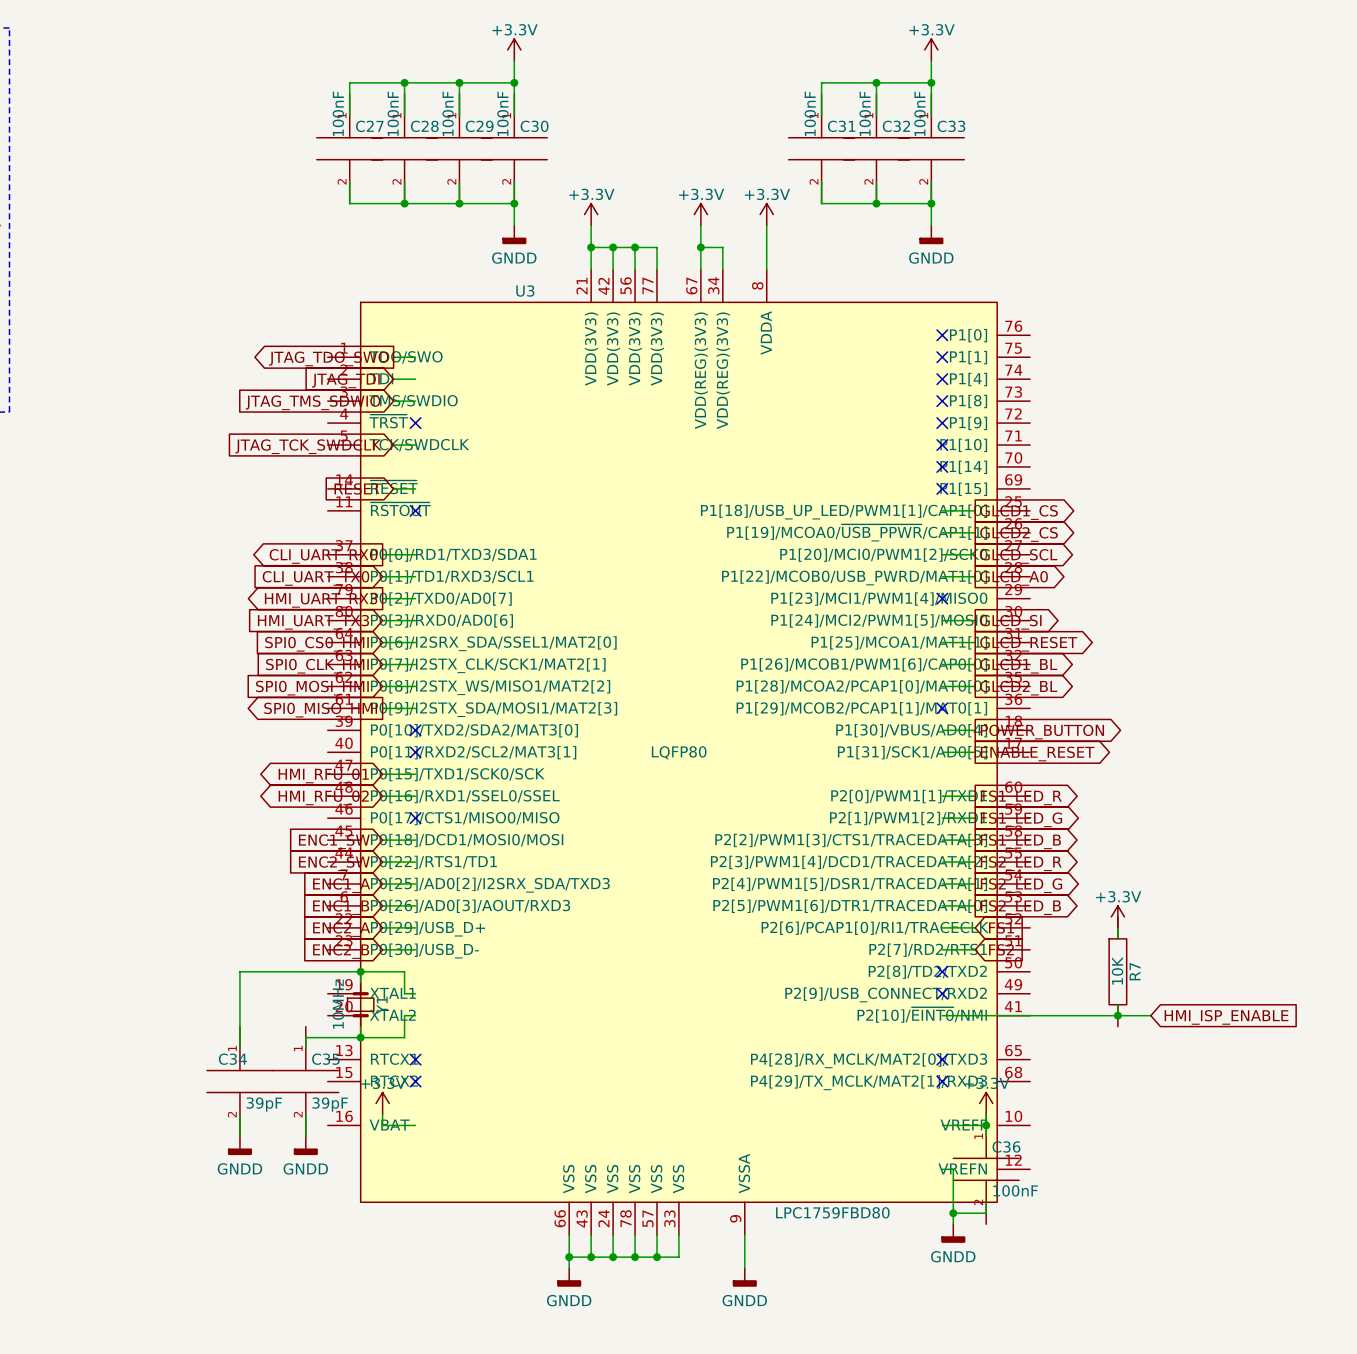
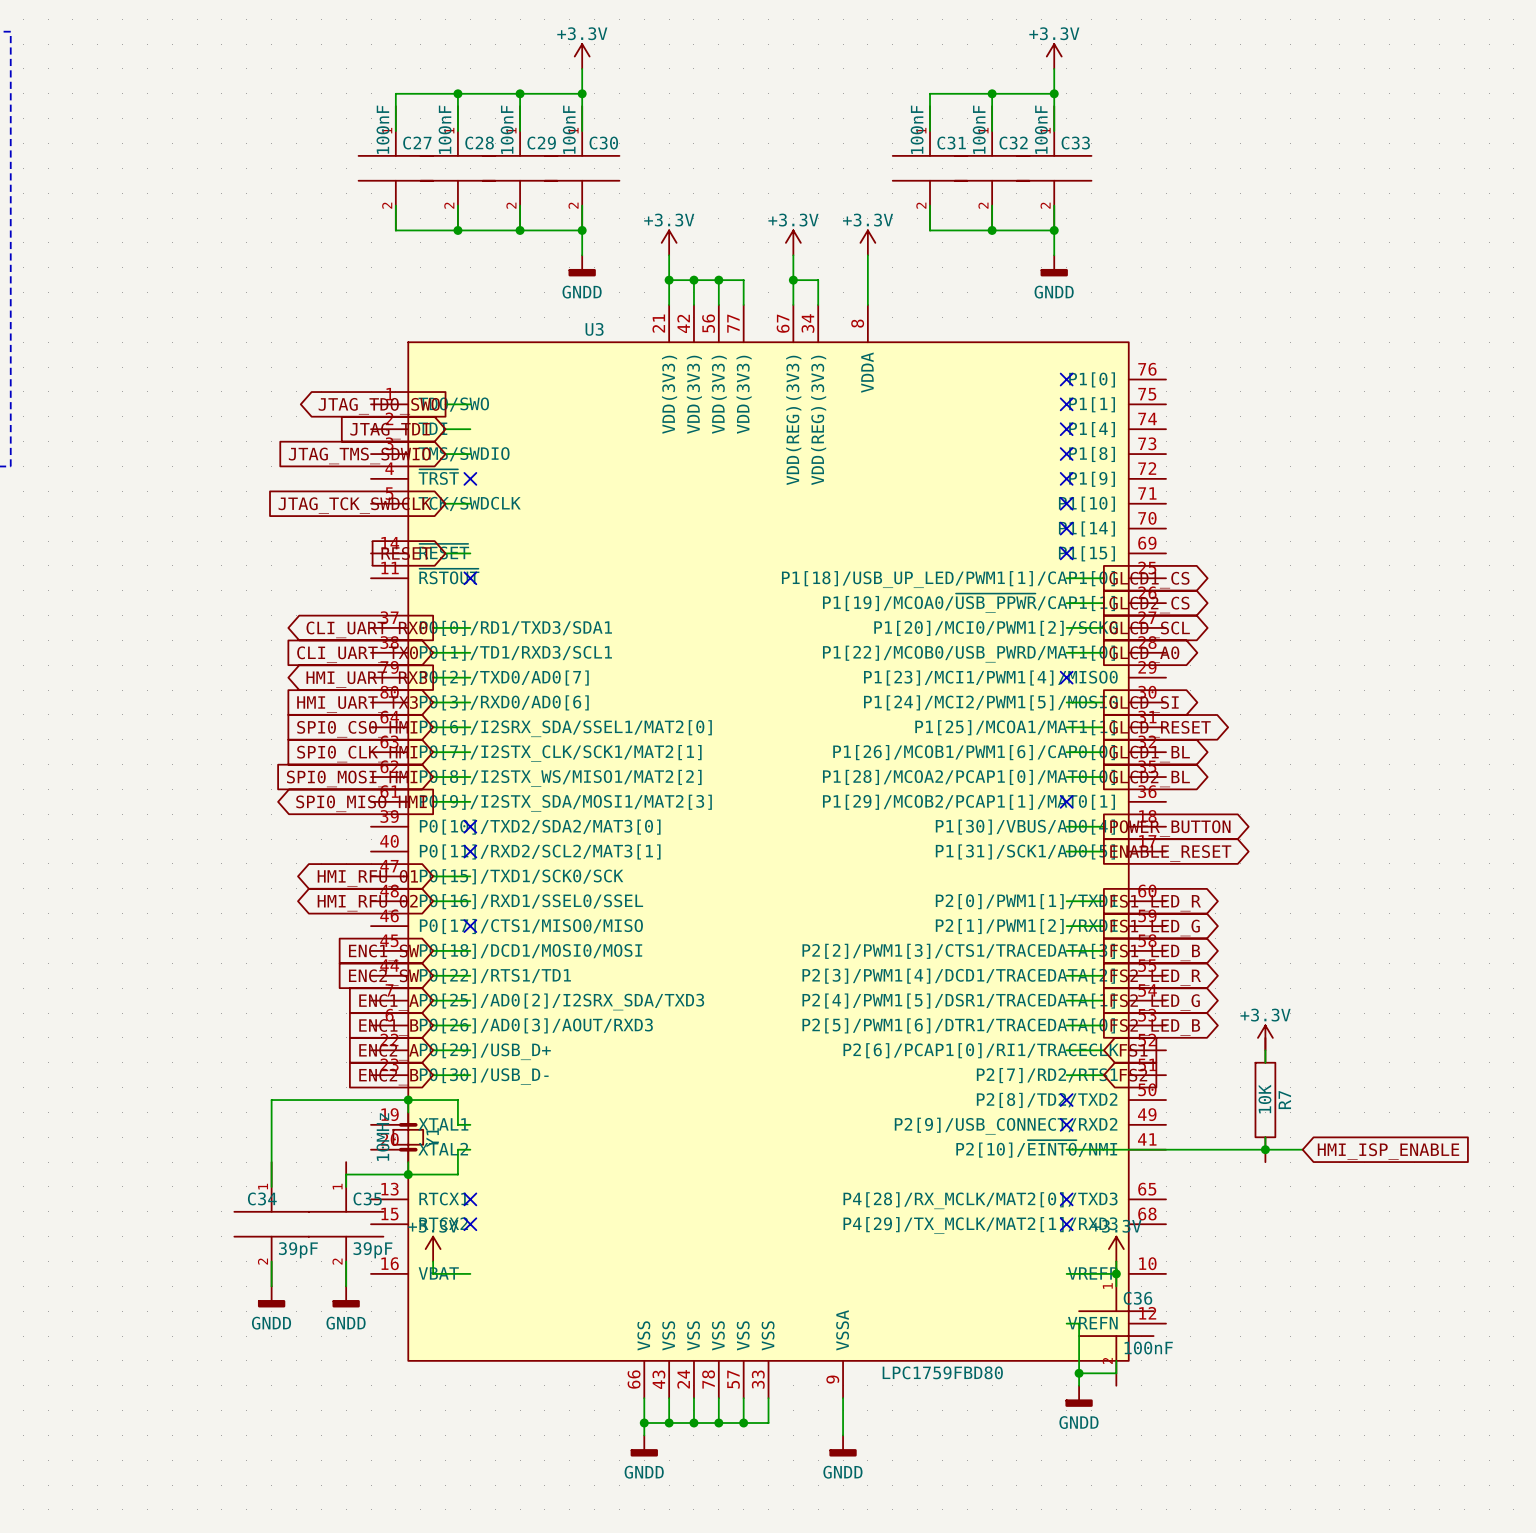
U3 text: LQFP80 (679, 752) -> none

